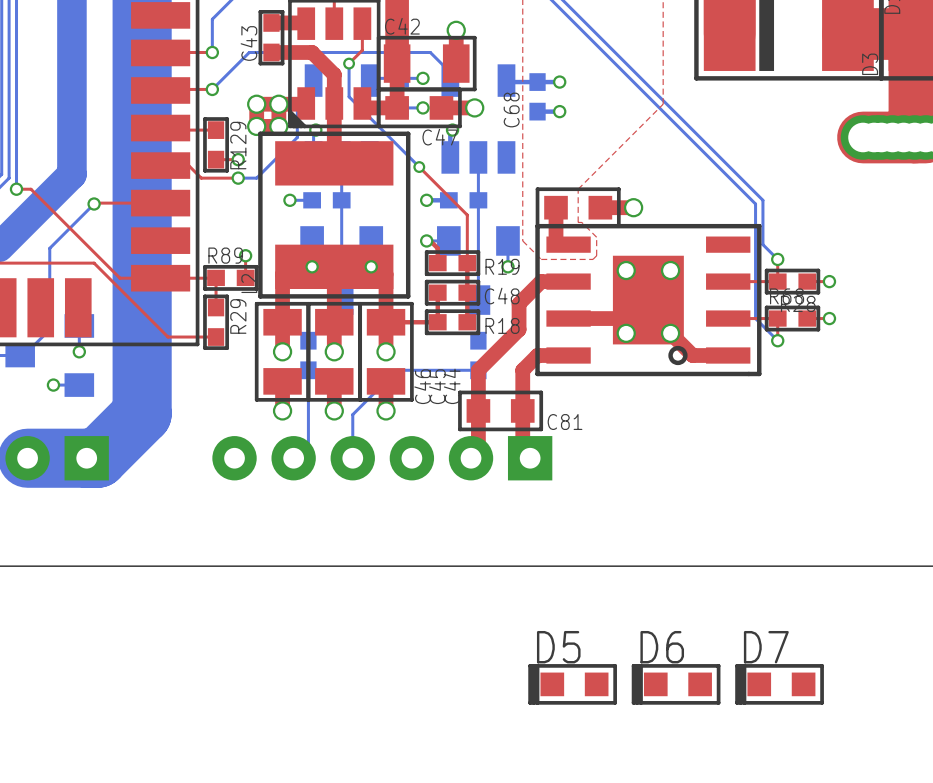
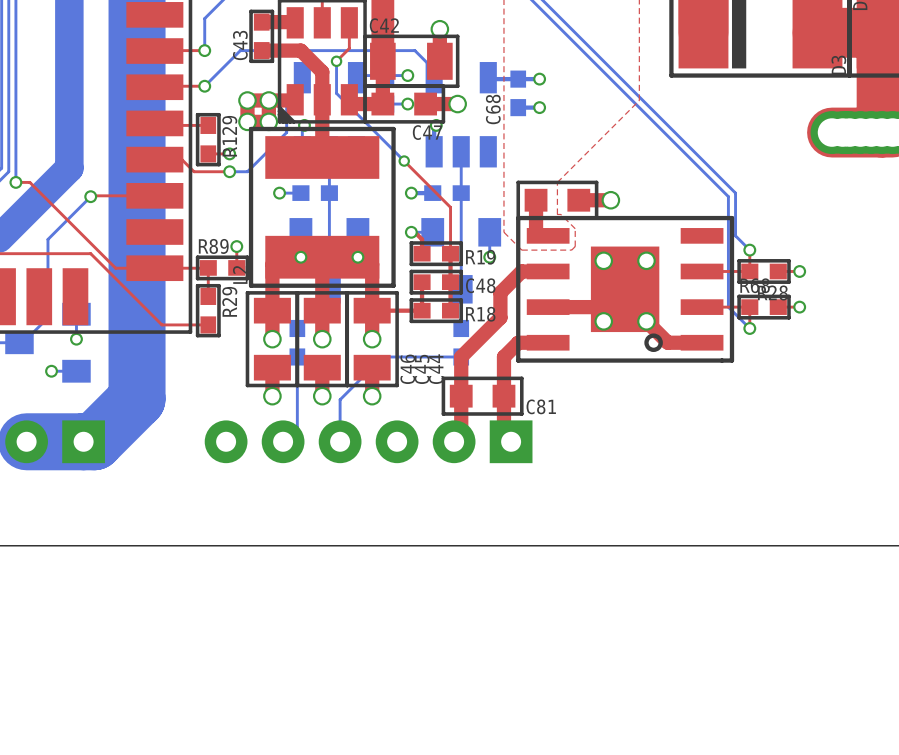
D5: (572, 684) -> none
D6: (676, 684) -> none
D7: (779, 684) -> none

